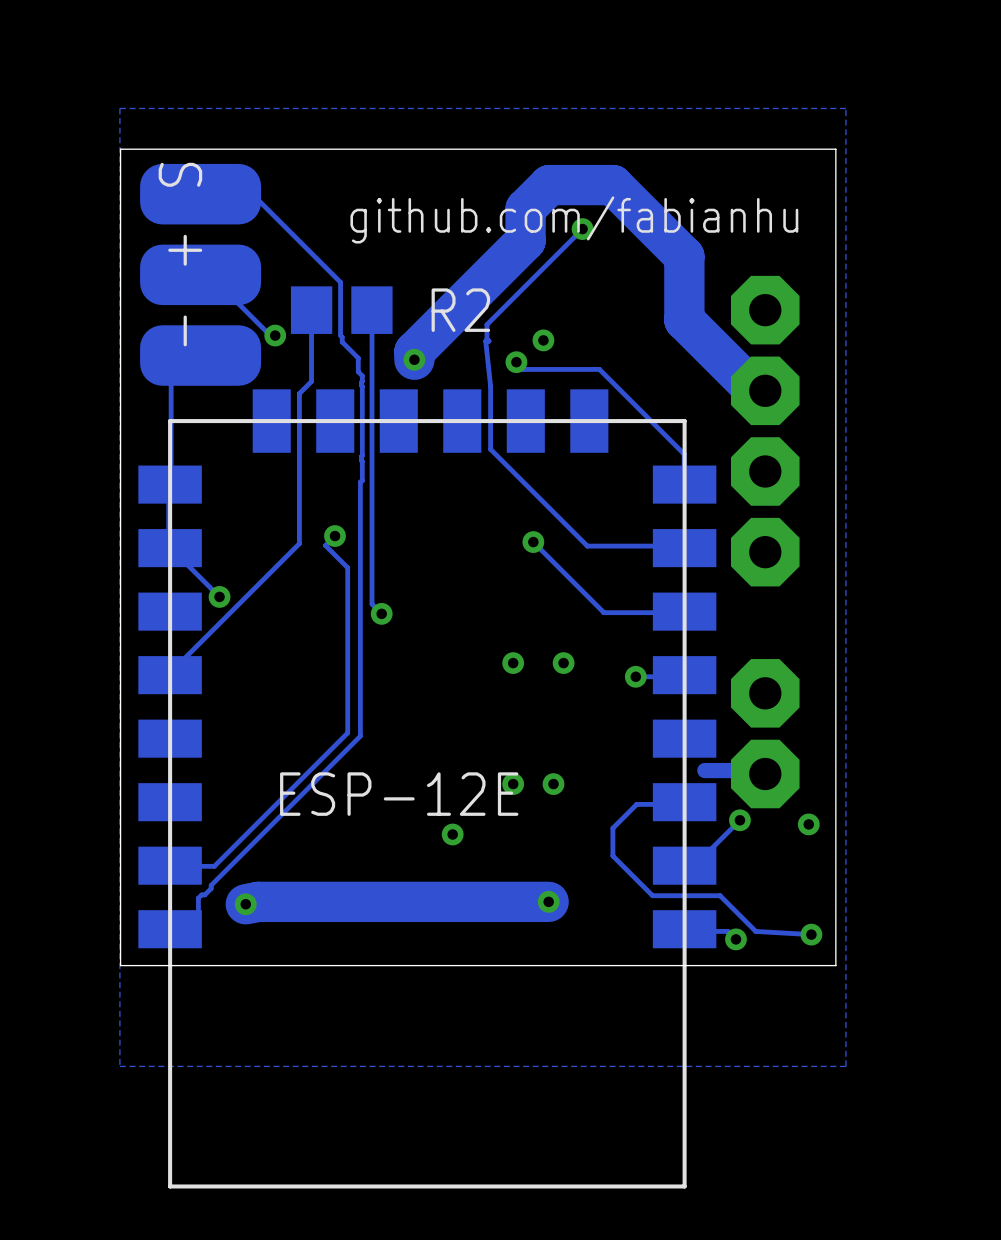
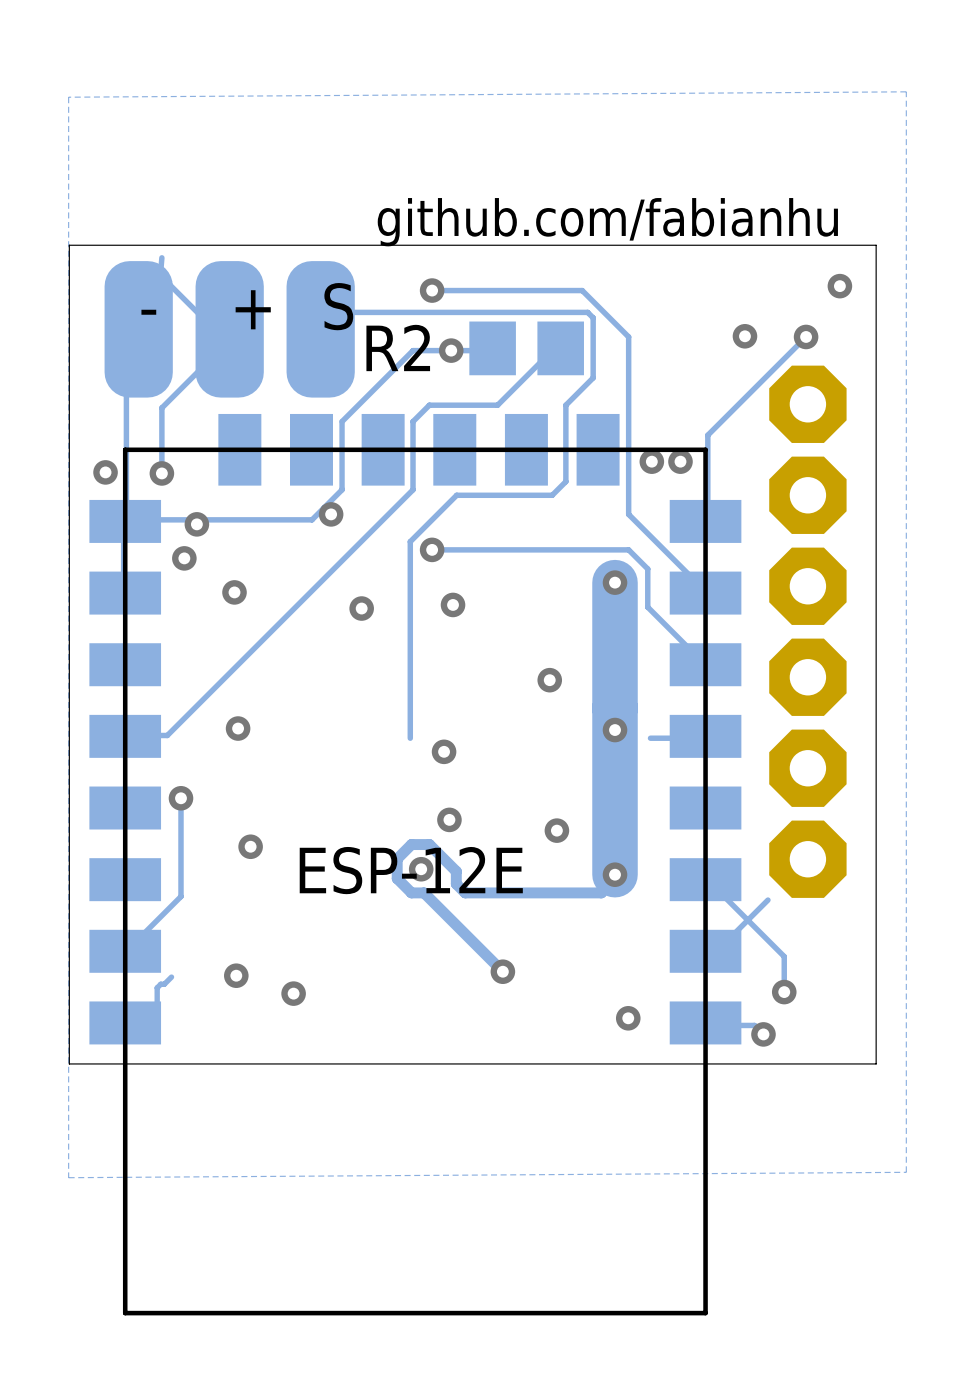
zone outline: (119, 108) (845, 108) (845, 1066) (119, 1066) -> (68, 97) (906, 91) (906, 1172) (68, 1177)
track: (200, 194) (253, 195) (340, 282) (340, 335) (342, 342) (358, 358) (358, 371) (362, 375) (362, 396) -> (492, 348) (492, 350) (413, 350) (342, 421)
track: (582, 229) (486, 324) (486, 339) (488, 341) (485, 341) (490, 386) (490, 449) (587, 546) (684, 546) -> (432, 290) (582, 290) (628, 336) (628, 514) (705, 590)
via: (582, 229) -> none
board edge: (835, 239) (835, 149) (120, 149) (120, 239) -> (876, 245) (69, 245)
part rotation: 0° (200, 274) -> 90° clockwise (229, 329)
via: none -> (839, 286)
via: none -> (432, 290)
R2 position: (341, 310) -> (526, 348)
track: (371, 310) (372, 604) (381, 613) -> none
R2 name position: R2 (460, 310) -> R2 (398, 347)
part position: (765, 310) -> (807, 677)
track: (311, 311) (311, 381) (299, 393) (299, 543) (170, 675) -> none
track: none -> (229, 329) (227, 331) (227, 342) (161, 407) (161, 473)
track: none -> (320, 329) (339, 312) (587, 312) (593, 317) (593, 377) (565, 405) (565, 481) (552, 495) (456, 495) (410, 541) (410, 738)
via: none -> (744, 336)
via: none -> (806, 336)
track: none -> (560, 348) (560, 350) (552, 350) (497, 405) (429, 405) (413, 421) (413, 489) (167, 735) (126, 735)
via: none -> (451, 350)
via: (275, 335) -> none
via: (543, 340) -> none
track: (414, 359) (414, 351) (525, 240) (525, 208) (549, 185) (612, 185) (684, 256) (684, 320) (747, 383) (763, 383) (765, 390) -> none
via: (414, 359) -> none
track: (516, 362) (523, 369) (599, 369) (684, 454) (684, 484) -> (806, 336) (707, 435) (707, 519) (705, 521)
via: (516, 362) -> none
part position: (765, 390) -> (807, 404)
via: none -> (651, 461)
via: none -> (680, 461)
via: none -> (105, 472)
via: none -> (161, 473)
track: (362, 455) (362, 480) (360, 482) (360, 736) (211, 885) (211, 888) -> (342, 488) (312, 519) (126, 519)
part position: (765, 471) -> (807, 495)
via: none -> (331, 514)
via: none -> (196, 524)
via: none -> (432, 549)
via: none -> (184, 558)
track: (335, 536) (325, 545) (347, 567) (347, 732) (214, 866) (170, 865) -> (180, 798) (180, 896) (125, 951)
via: (335, 536) -> none
track: none -> (615, 582) (615, 874) (601, 892) (465, 892) (456, 883) (456, 871) (429, 844) (411, 844) (397, 858) (397, 878) (411, 892) (424, 892) (502, 971)
via: none -> (615, 582)
track: (533, 542) (603, 612) (684, 611) -> (432, 549) (628, 549) (647, 568) (647, 607) (705, 664)
via: (533, 542) -> none
via: none -> (234, 592)
track: (170, 548) (219, 596) -> none
part position: (765, 552) -> (807, 586)
via: none -> (453, 604)
via: none -> (361, 608)
via: (219, 596) -> none
via: (381, 613) -> none
via: none -> (549, 680)
via: (513, 663) -> none
via: (563, 663) -> none
via: none -> (238, 728)
via: none -> (615, 730)
via: (635, 676) -> none
via: none -> (444, 751)
part position: (765, 693) -> (807, 768)
via: none -> (180, 798)
via: none -> (449, 819)
via: none -> (556, 830)
track: (740, 770) (704, 770) -> none
via: none -> (250, 846)
part position: (765, 774) -> (807, 859)
via: (513, 784) -> none
via: (553, 784) -> none
via: none -> (421, 869)
via: none -> (615, 874)
track: (684, 802) (684, 804) (636, 804) (612, 828) (612, 856) (652, 895) (720, 895) (755, 931) (811, 934) -> (705, 879) (784, 956) (784, 992)
via: (739, 820) -> none
via: (808, 824) -> none
via: (452, 834) -> none
via: none -> (502, 971)
track: (548, 901) (258, 901) (245, 904) -> none
via: (548, 901) -> none
via: none -> (784, 992)
via: none -> (293, 993)
via position: (245, 904) -> (236, 975)
via: none -> (628, 1018)
via: (811, 934) -> none

